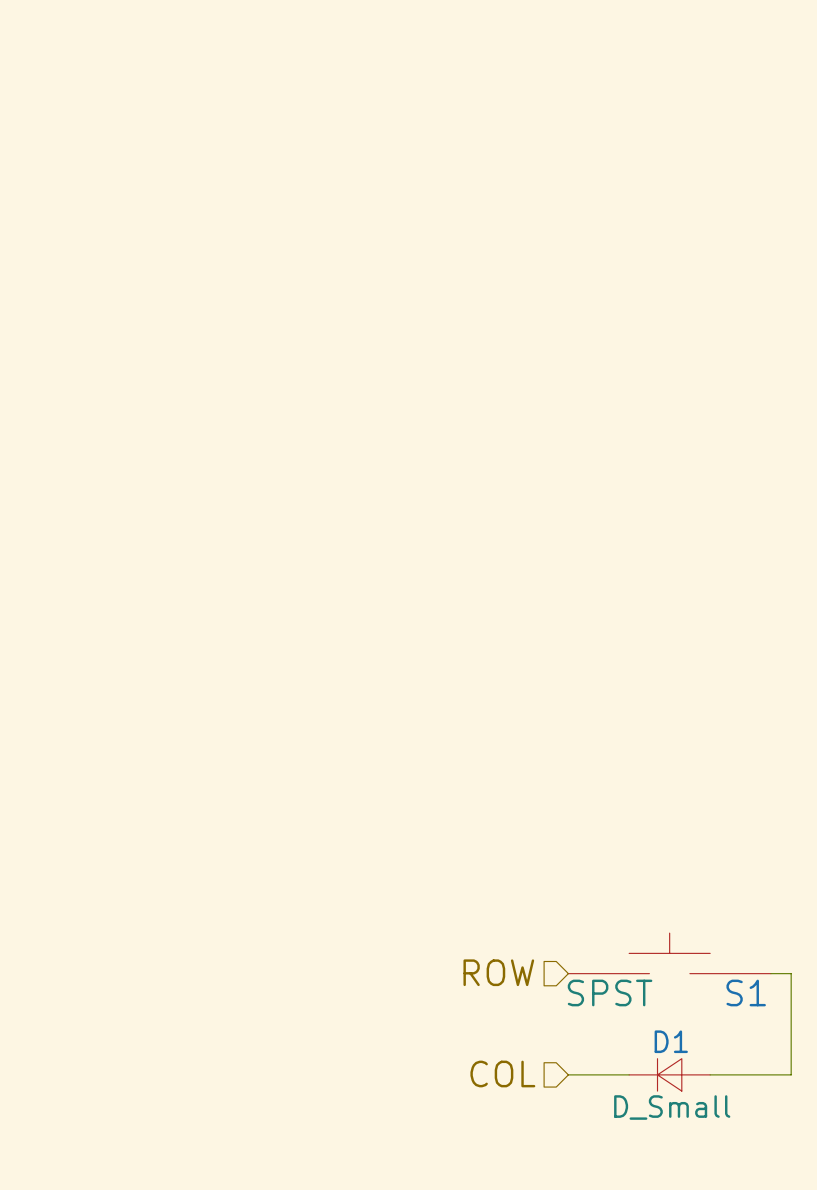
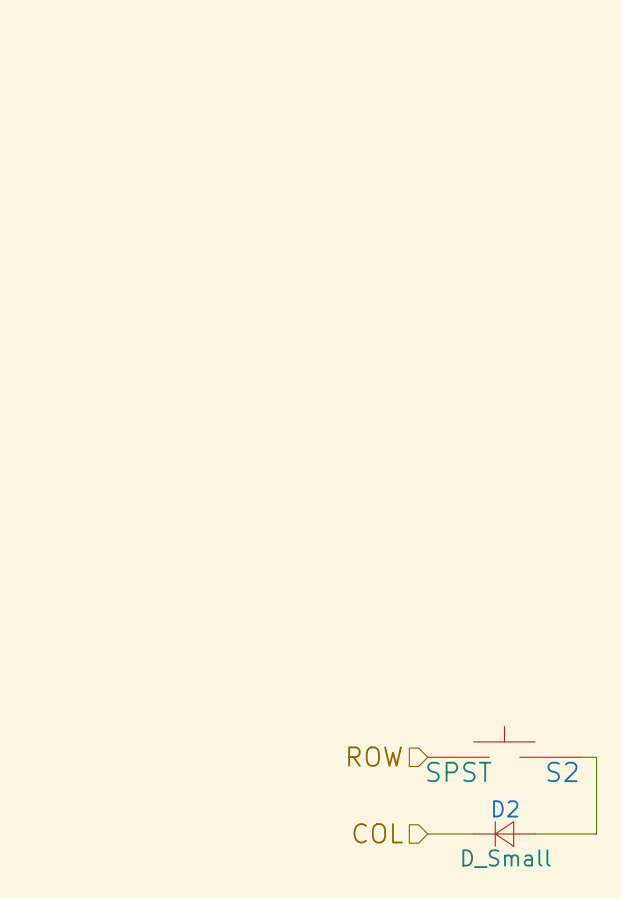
S1 name: S1 (746, 992) -> S2 (562, 771)
D1 name: D1 (671, 1041) -> D2 (505, 808)

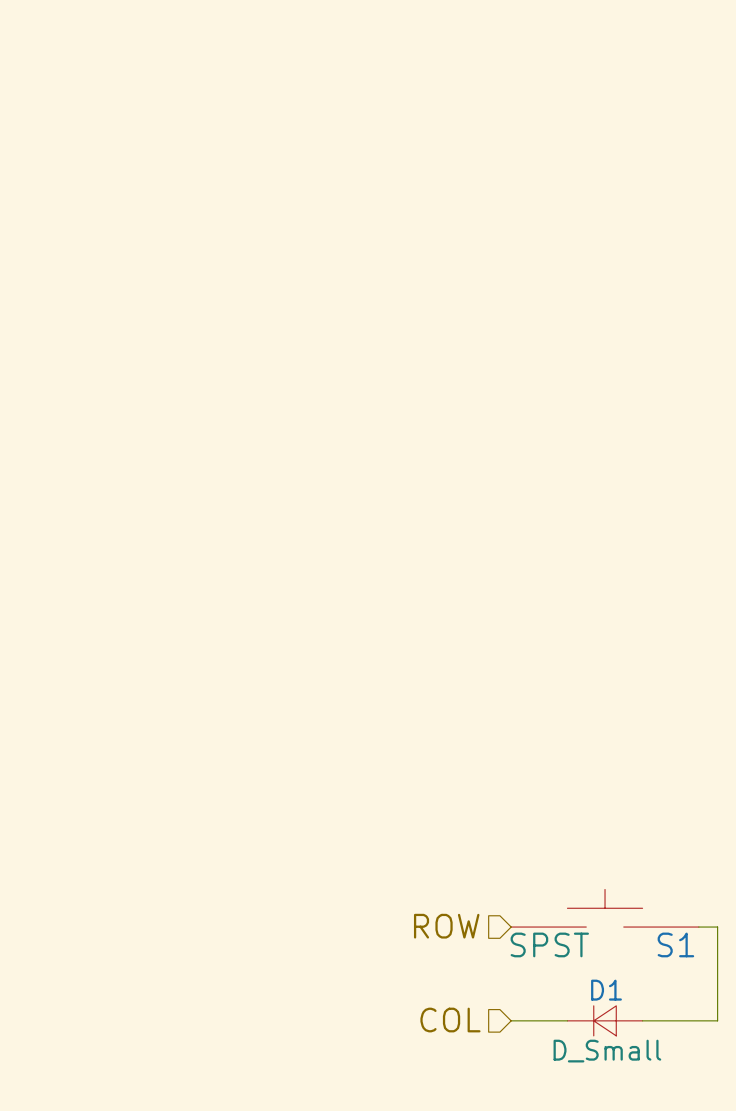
S2 name: S2 (562, 771) -> S1 (675, 944)
D2 name: D2 (505, 808) -> D1 (606, 990)

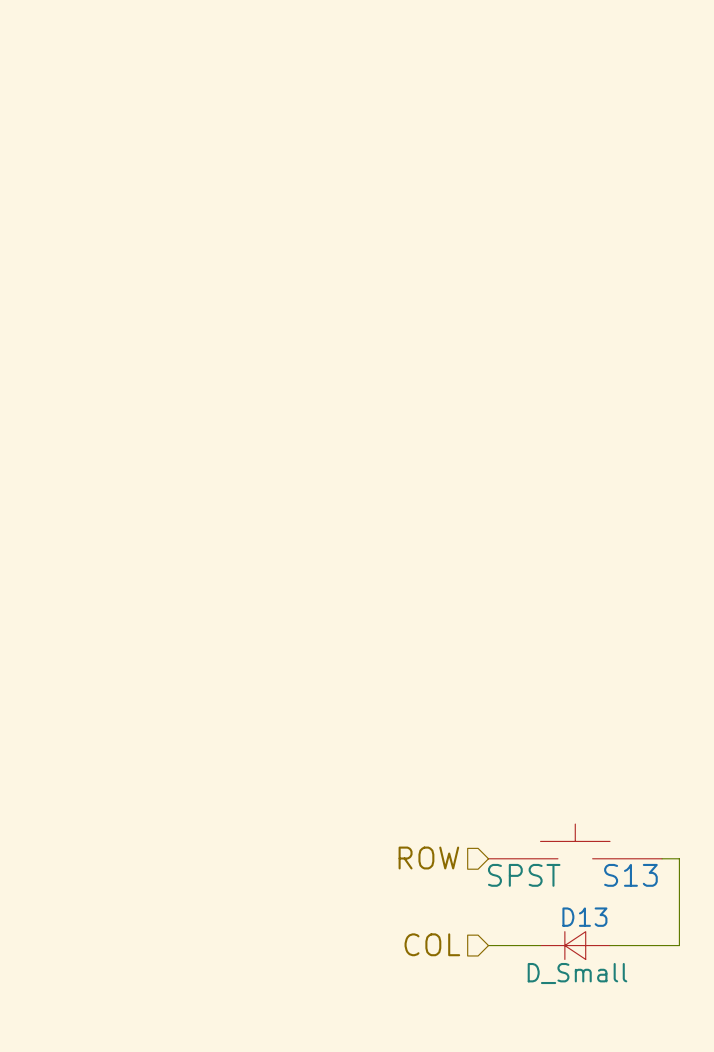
S1 name: S1 (675, 944) -> S13 (630, 875)
D1 name: D1 (606, 990) -> D13 (584, 917)

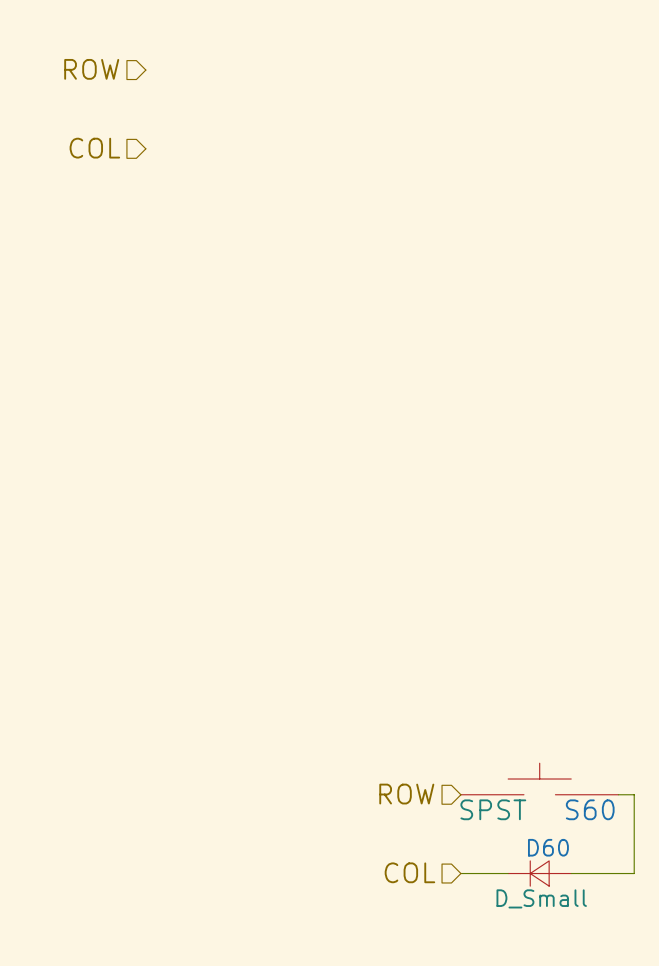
hierarchical label: none -> ROW (91, 69)
hierarchical label: none -> COL (94, 148)
S13 name: S13 (630, 875) -> S60 (590, 809)
D13 name: D13 (584, 917) -> D60 (548, 847)

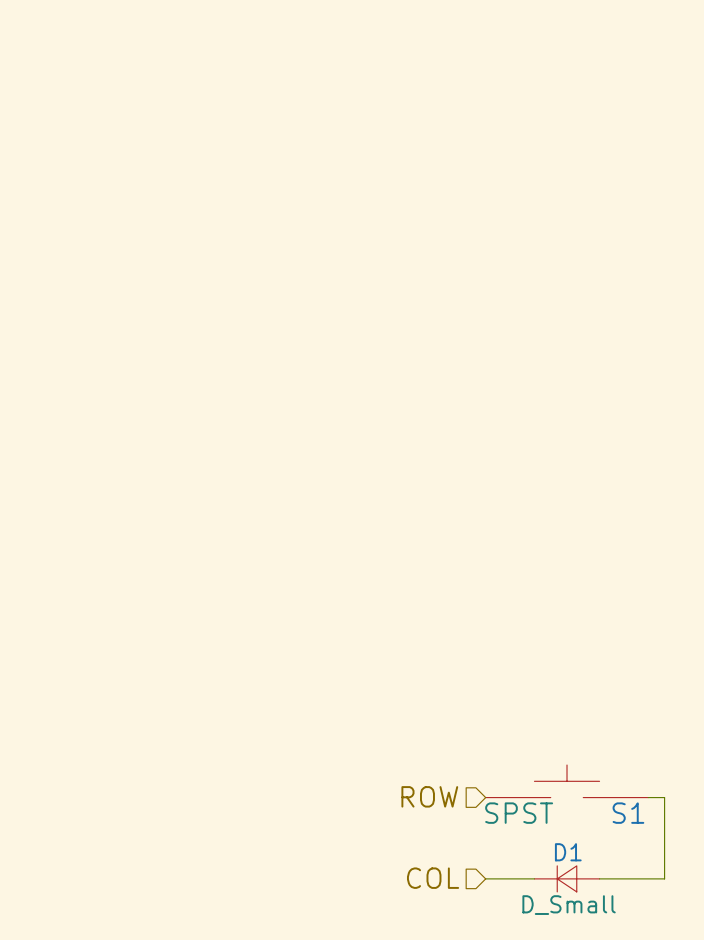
hierarchical label: ROW (91, 69) -> none
hierarchical label: COL (94, 148) -> none
S60 name: S60 (590, 809) -> S1 (628, 813)
D60 name: D60 (548, 847) -> D1 (568, 852)

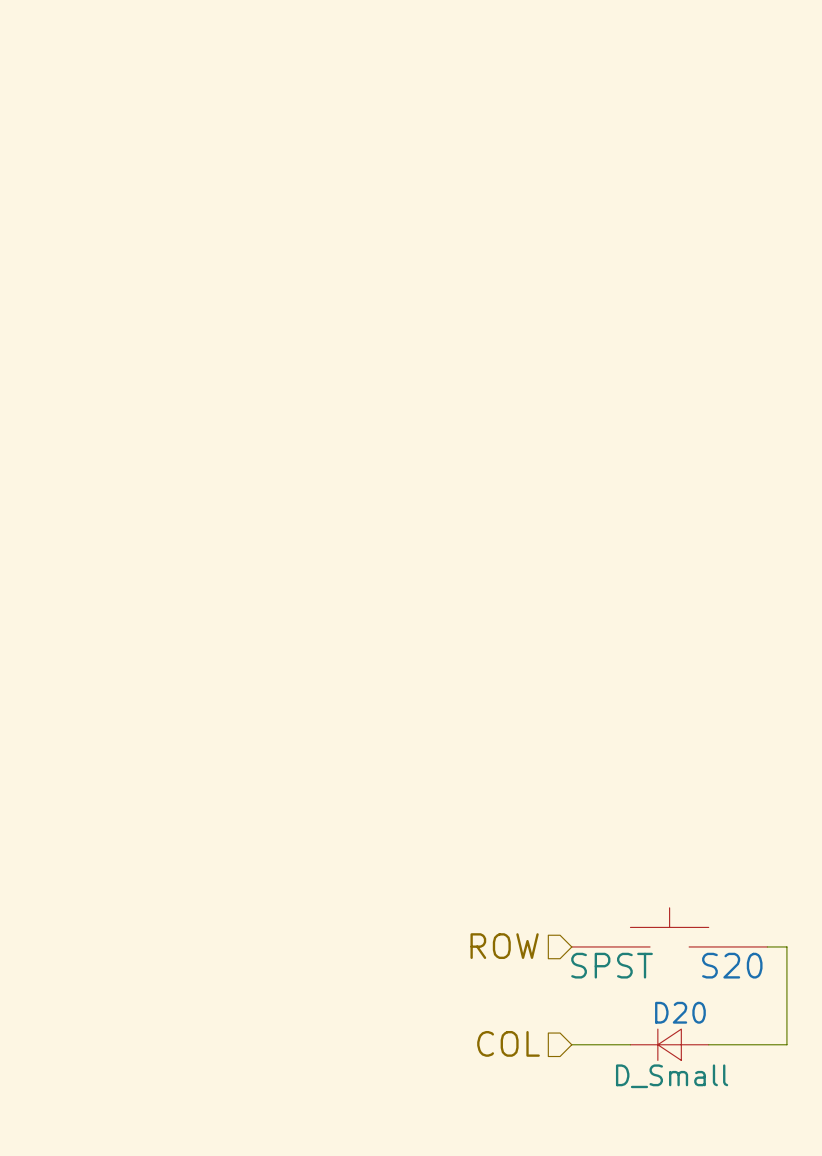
S1 name: S1 (628, 813) -> S20 (732, 965)
D1 name: D1 (568, 852) -> D20 (680, 1012)

